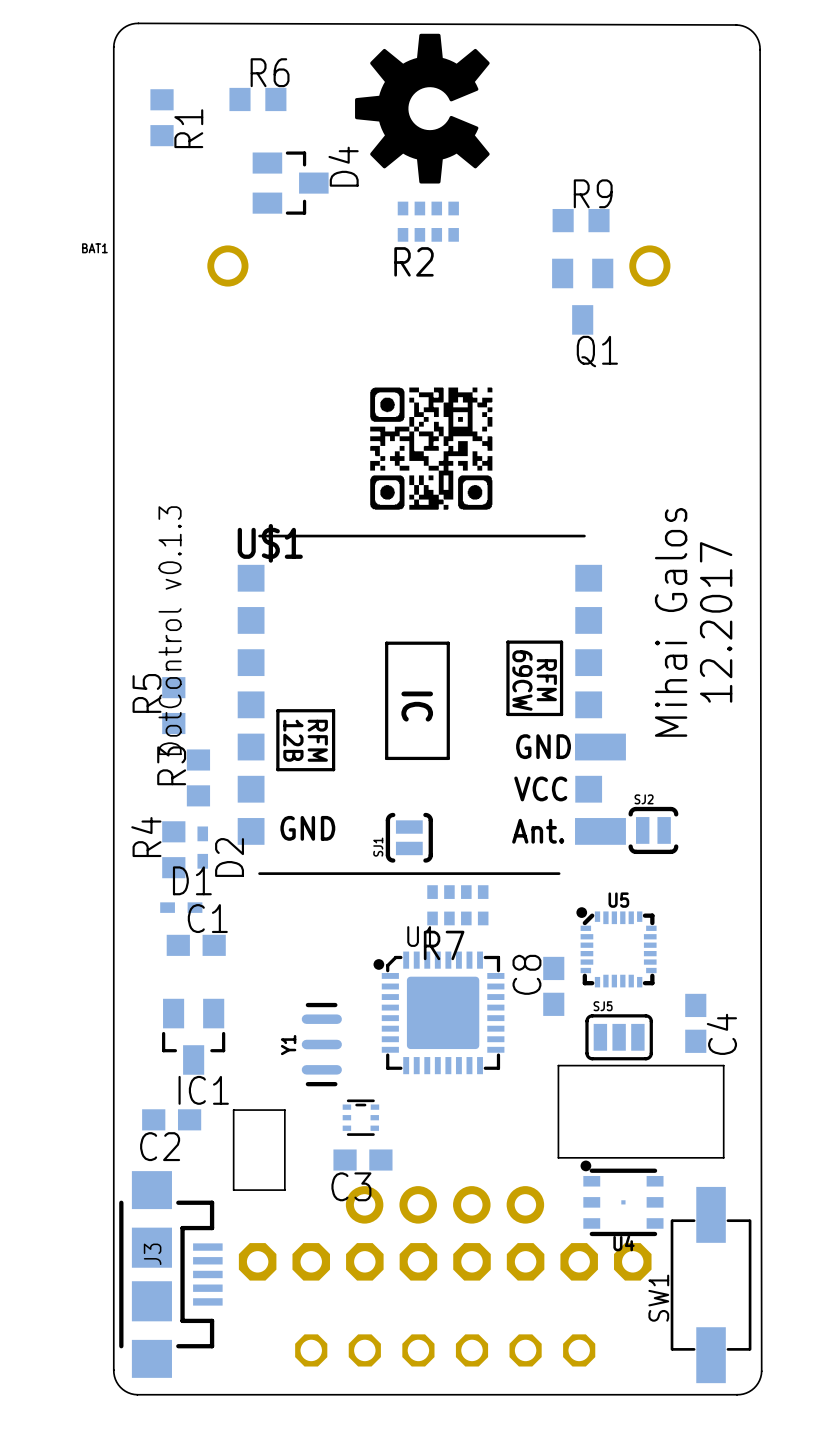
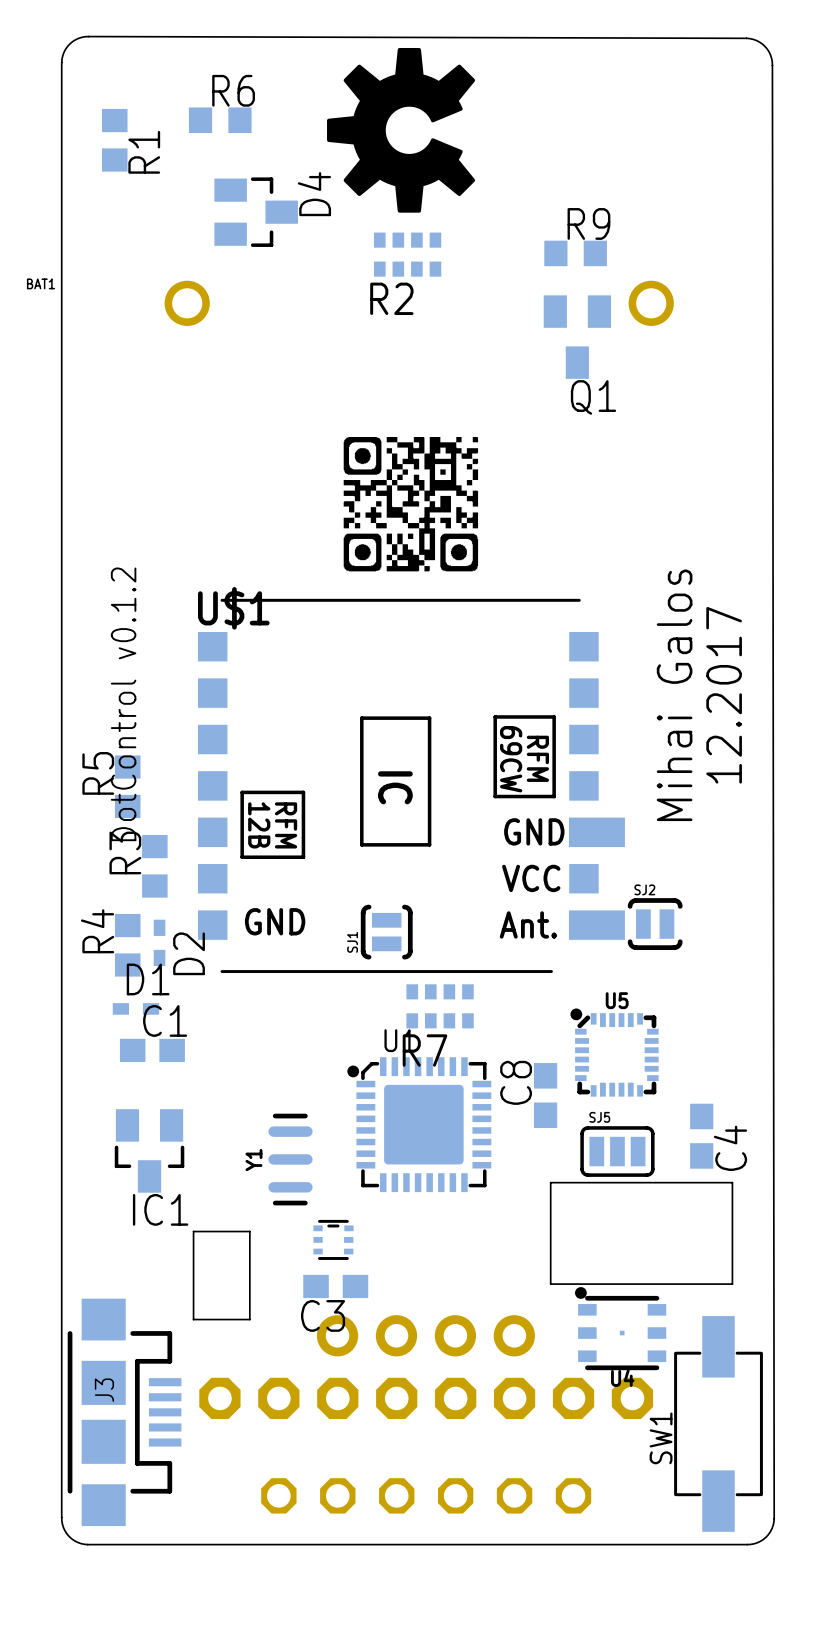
text: DotControl v0.1.3 (170, 630) -> DotControl v0.1.2 (123, 704)
C2: (171, 1119) -> none

